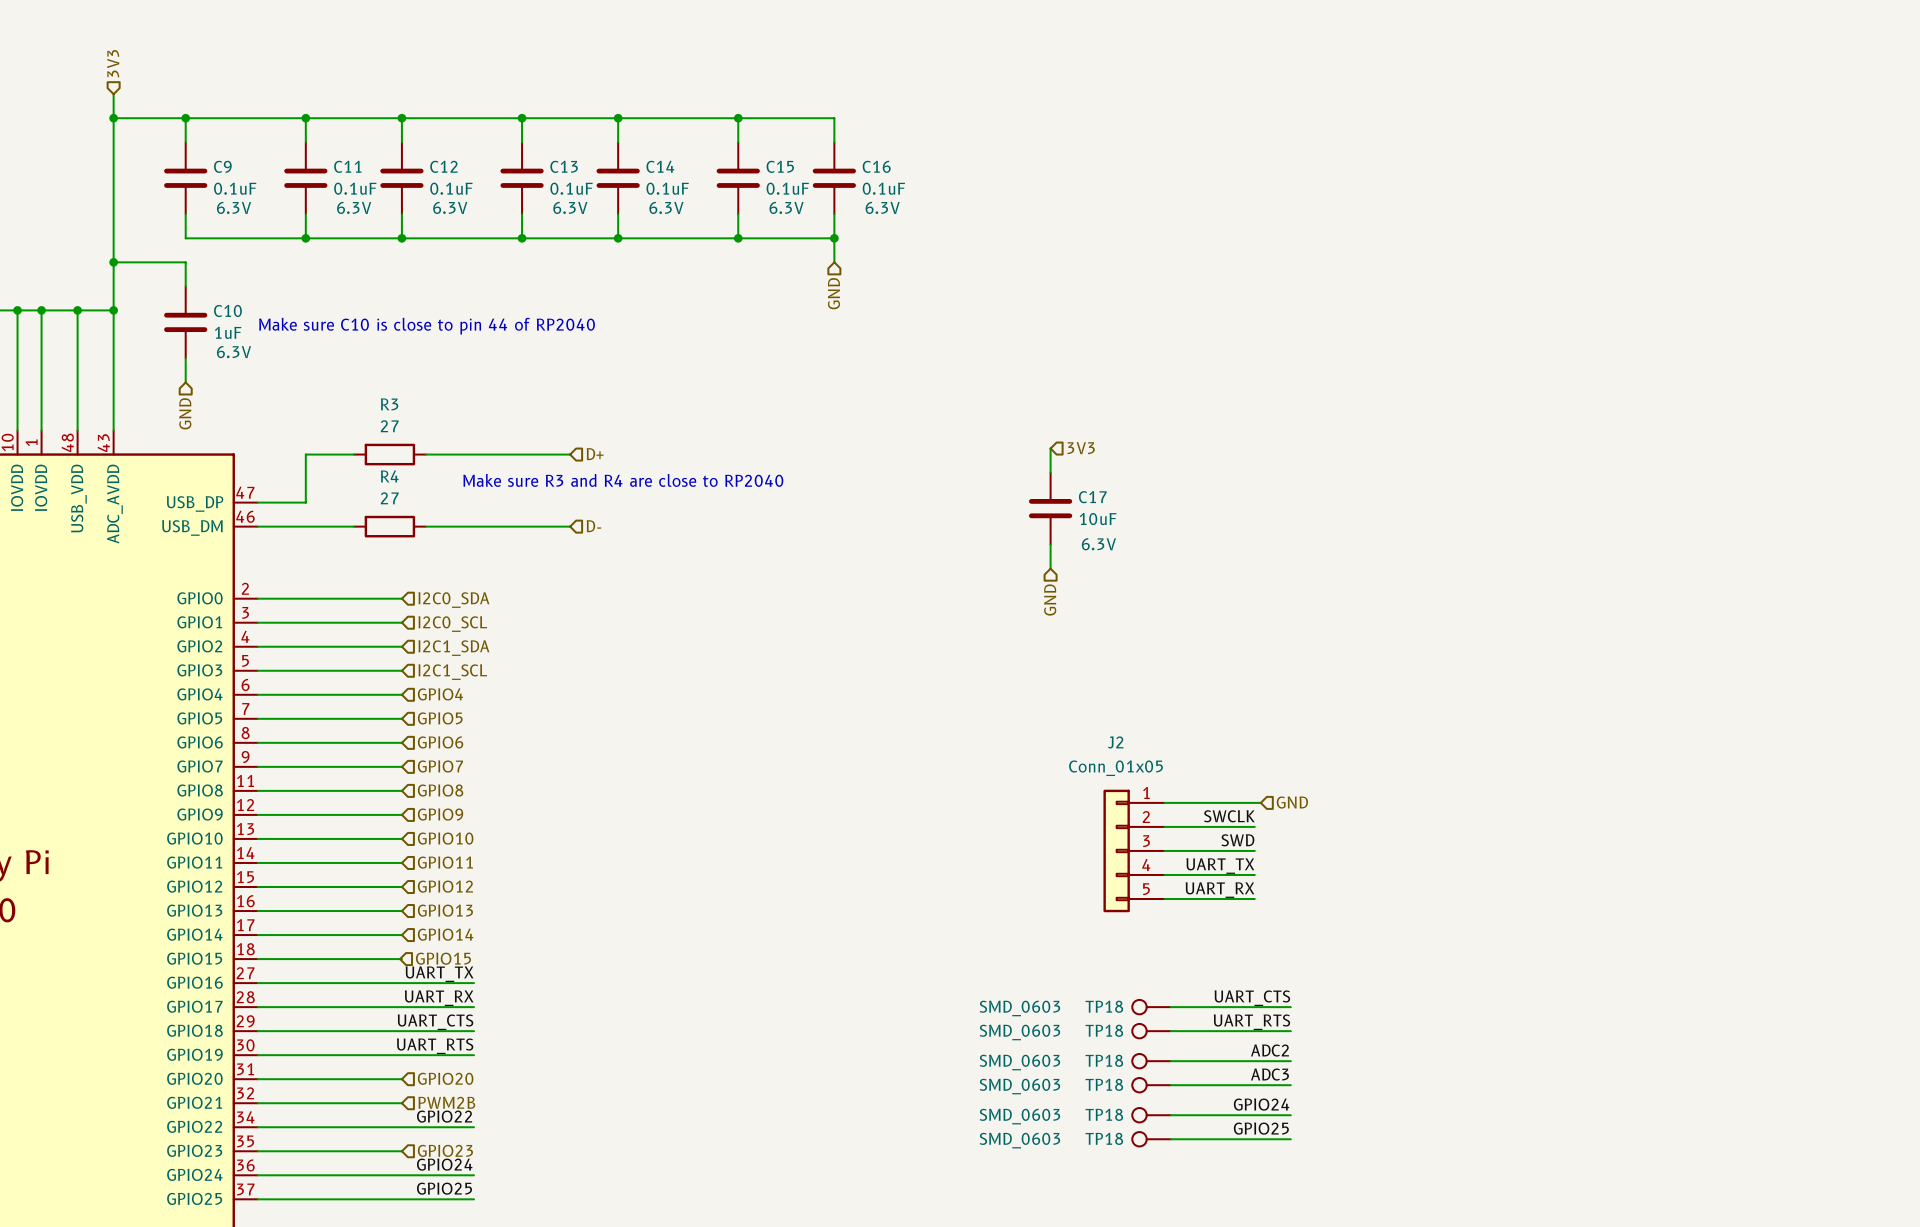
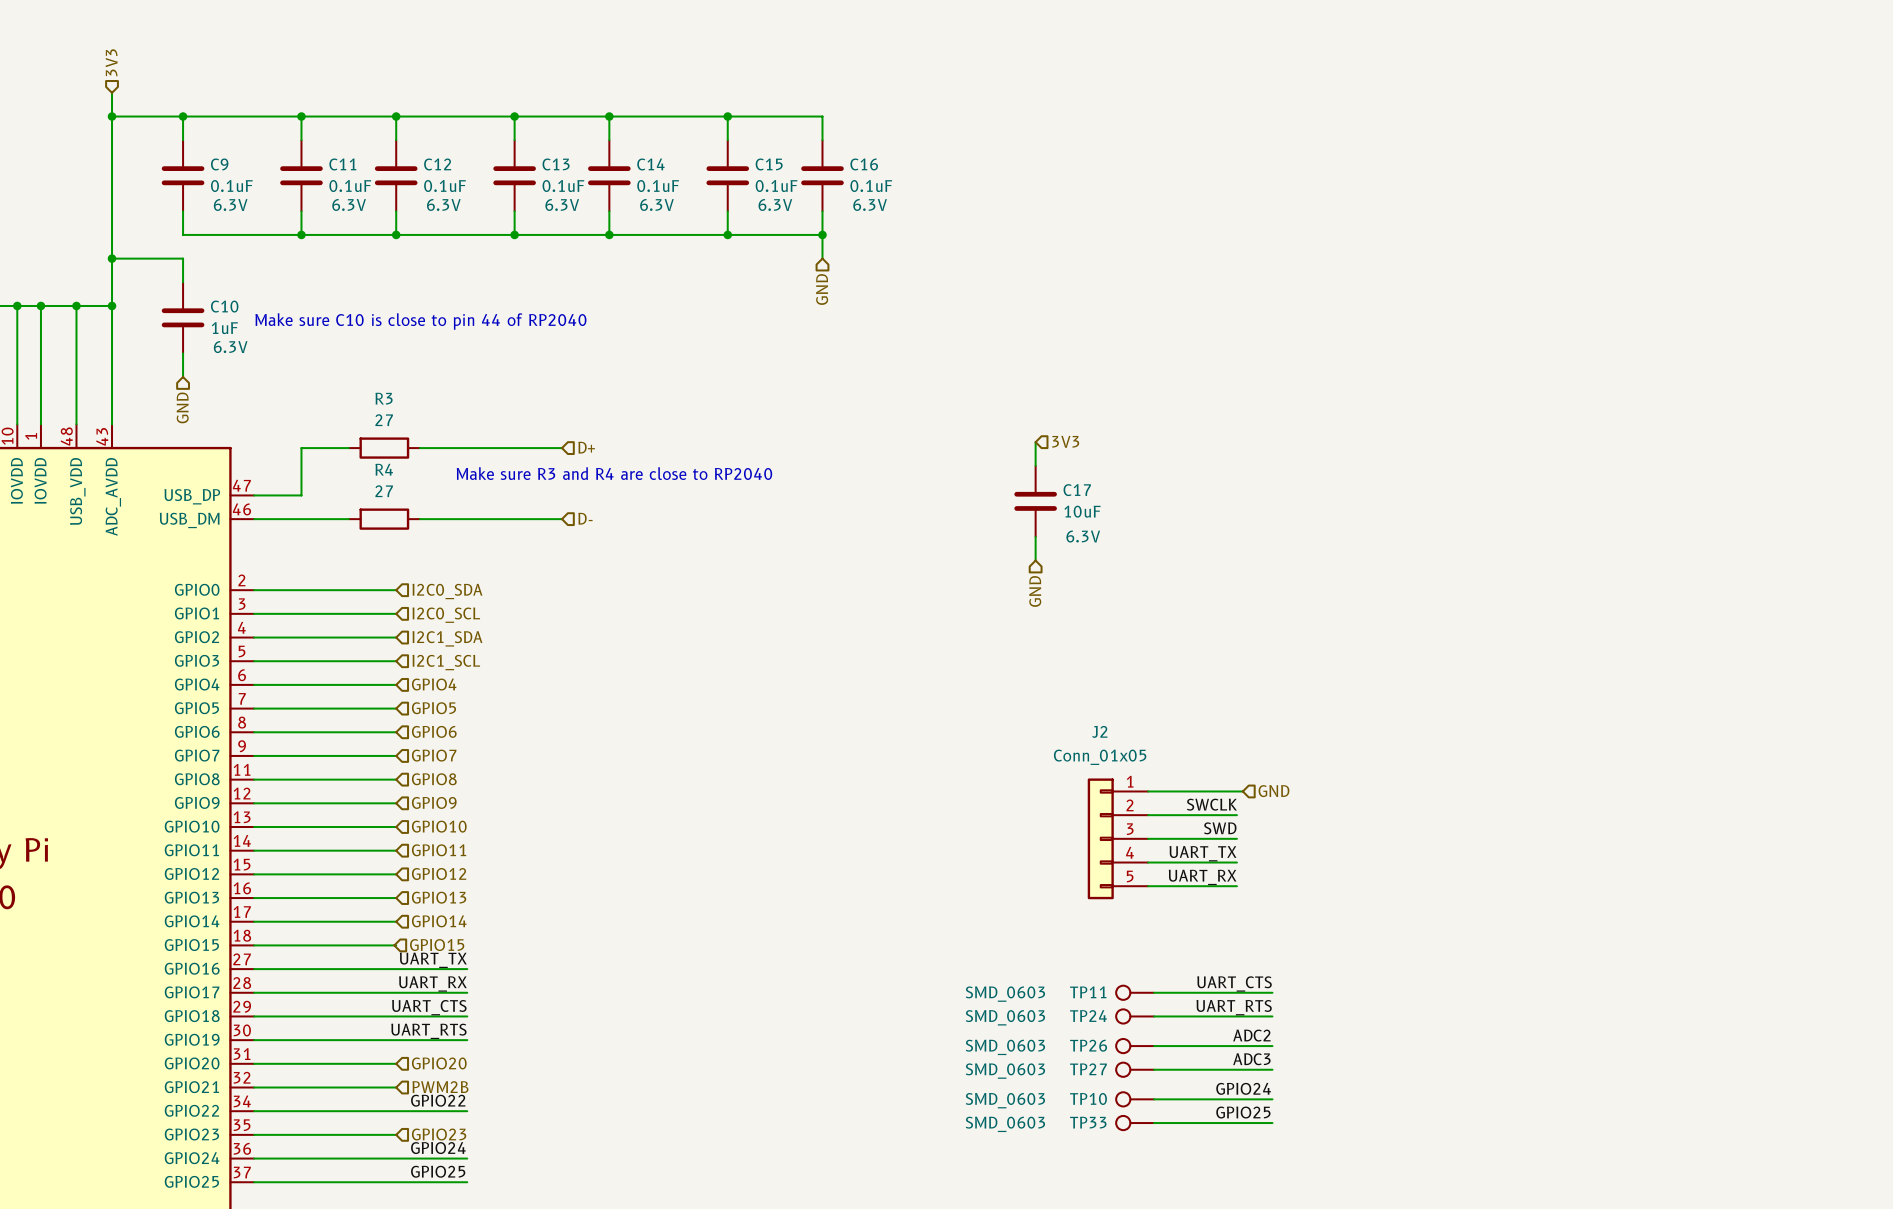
TP18 name: TP18 (1104, 1006) -> TP11 (1088, 992)
TP18 name: TP18 (1104, 1030) -> TP24 (1088, 1016)
TP18 name: TP18 (1104, 1060) -> TP26 (1088, 1045)
TP18 name: TP18 (1104, 1084) -> TP27 (1088, 1069)
TP18 name: TP18 (1104, 1114) -> TP10 (1088, 1098)
TP18 name: TP18 (1104, 1138) -> TP33 (1088, 1122)

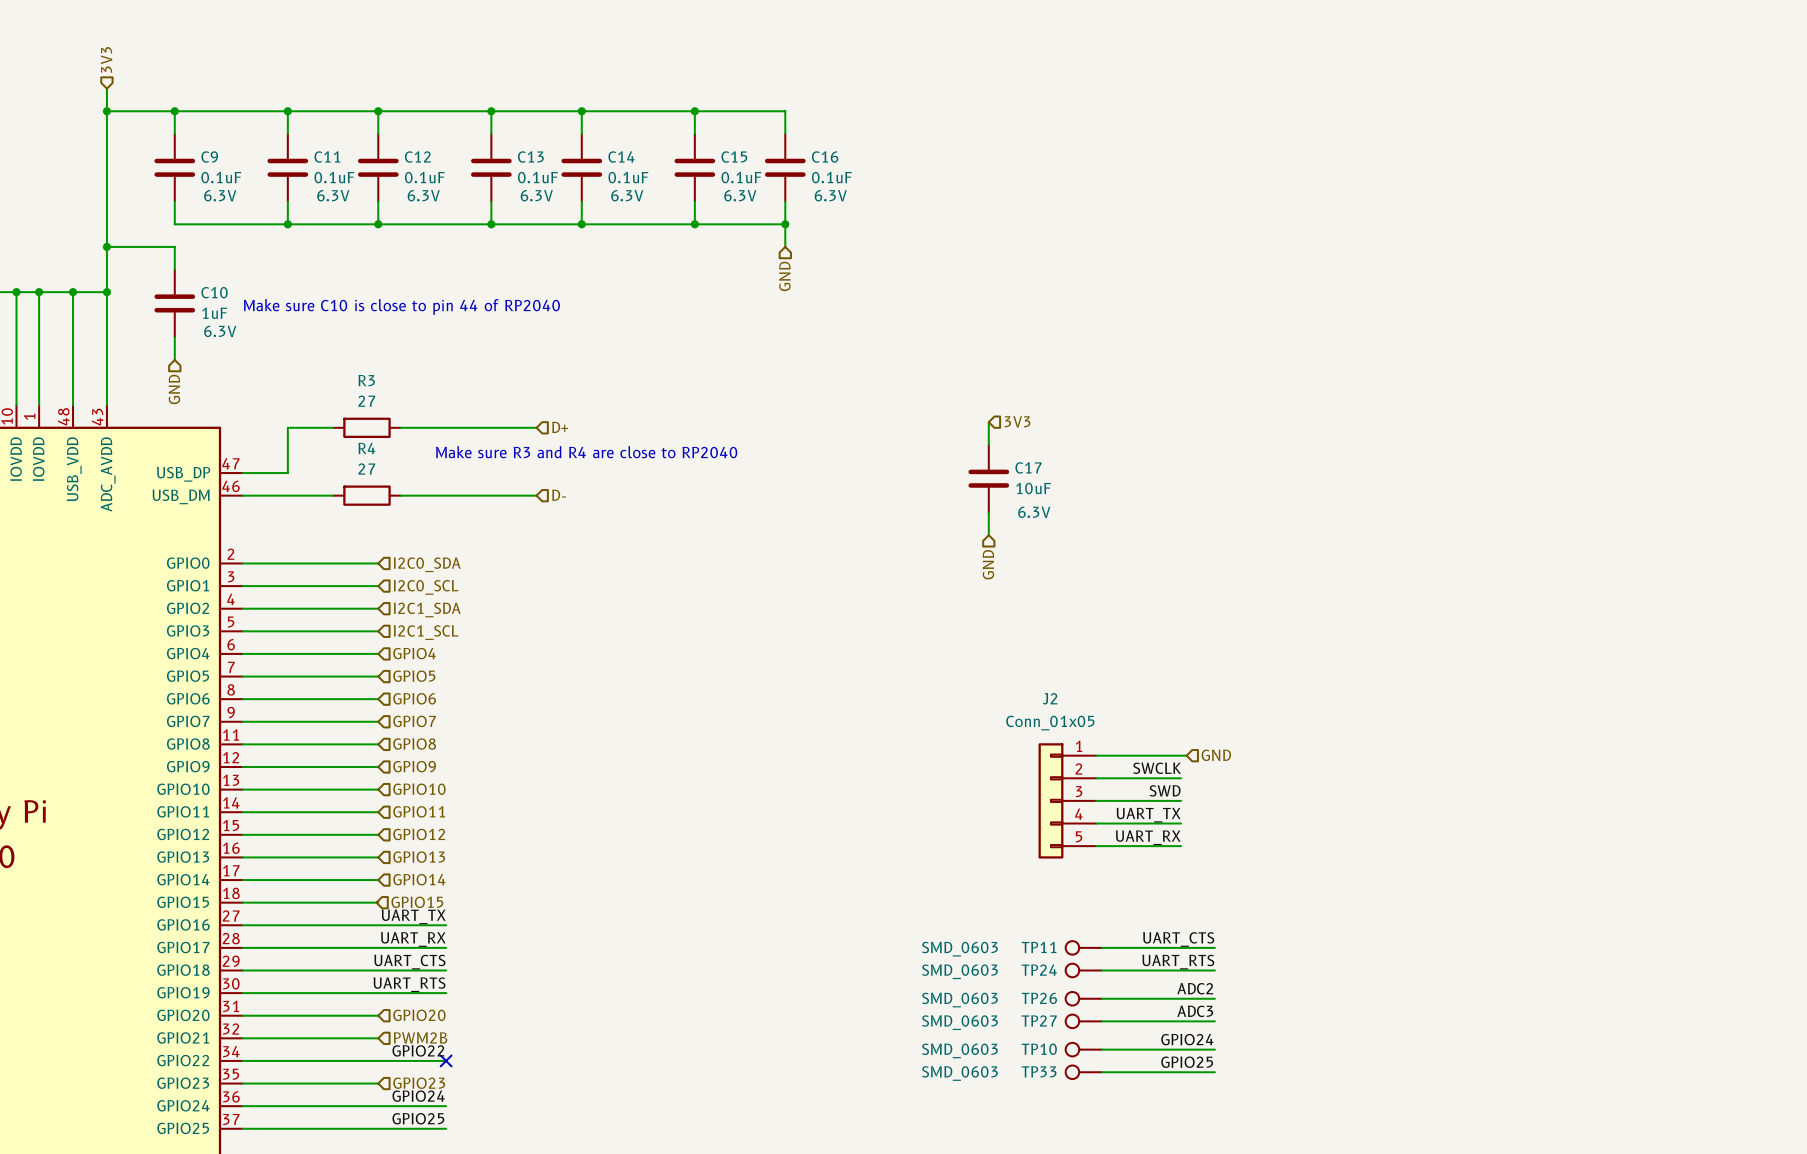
no-connect mark: none -> (446, 1060)

